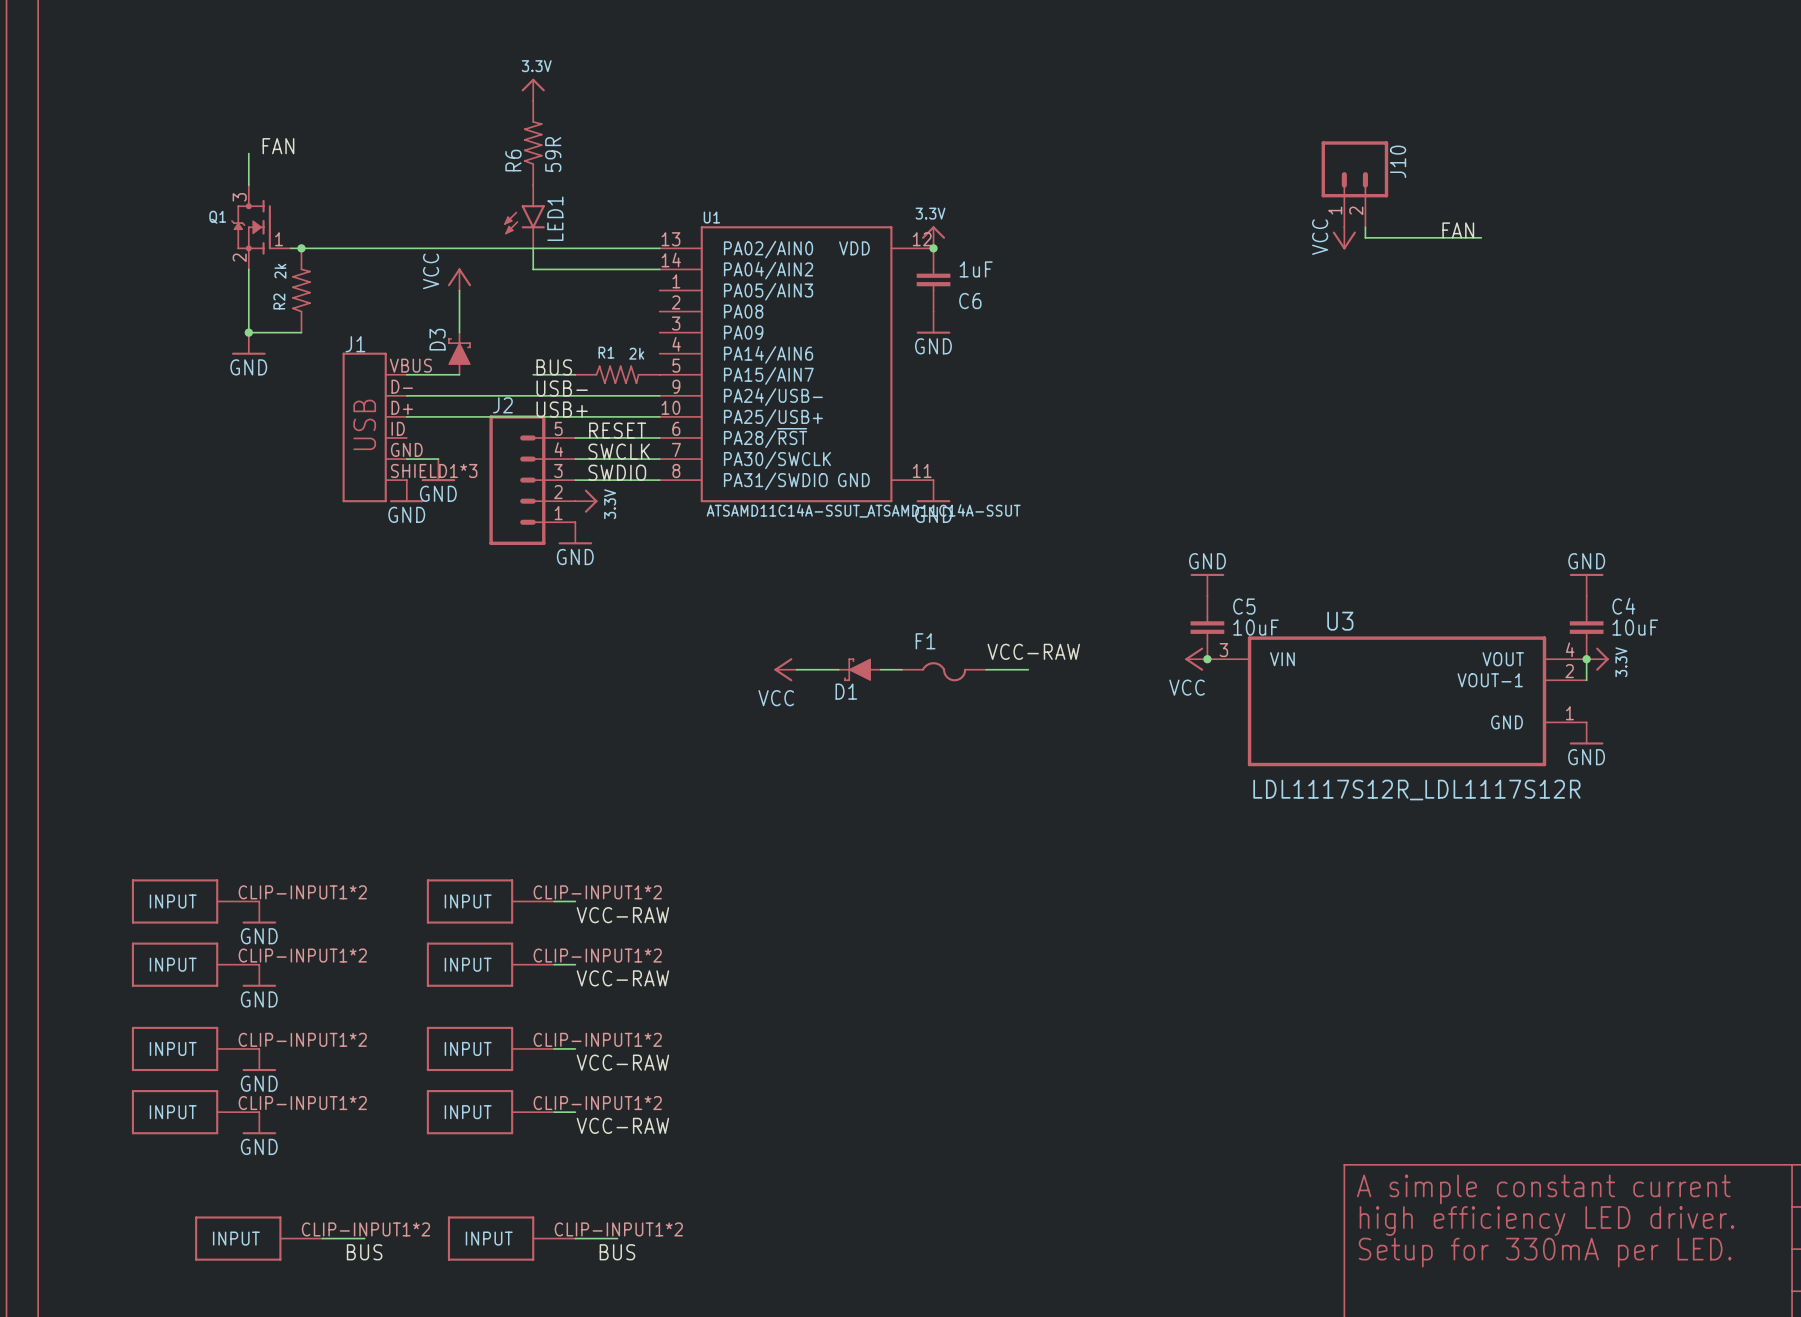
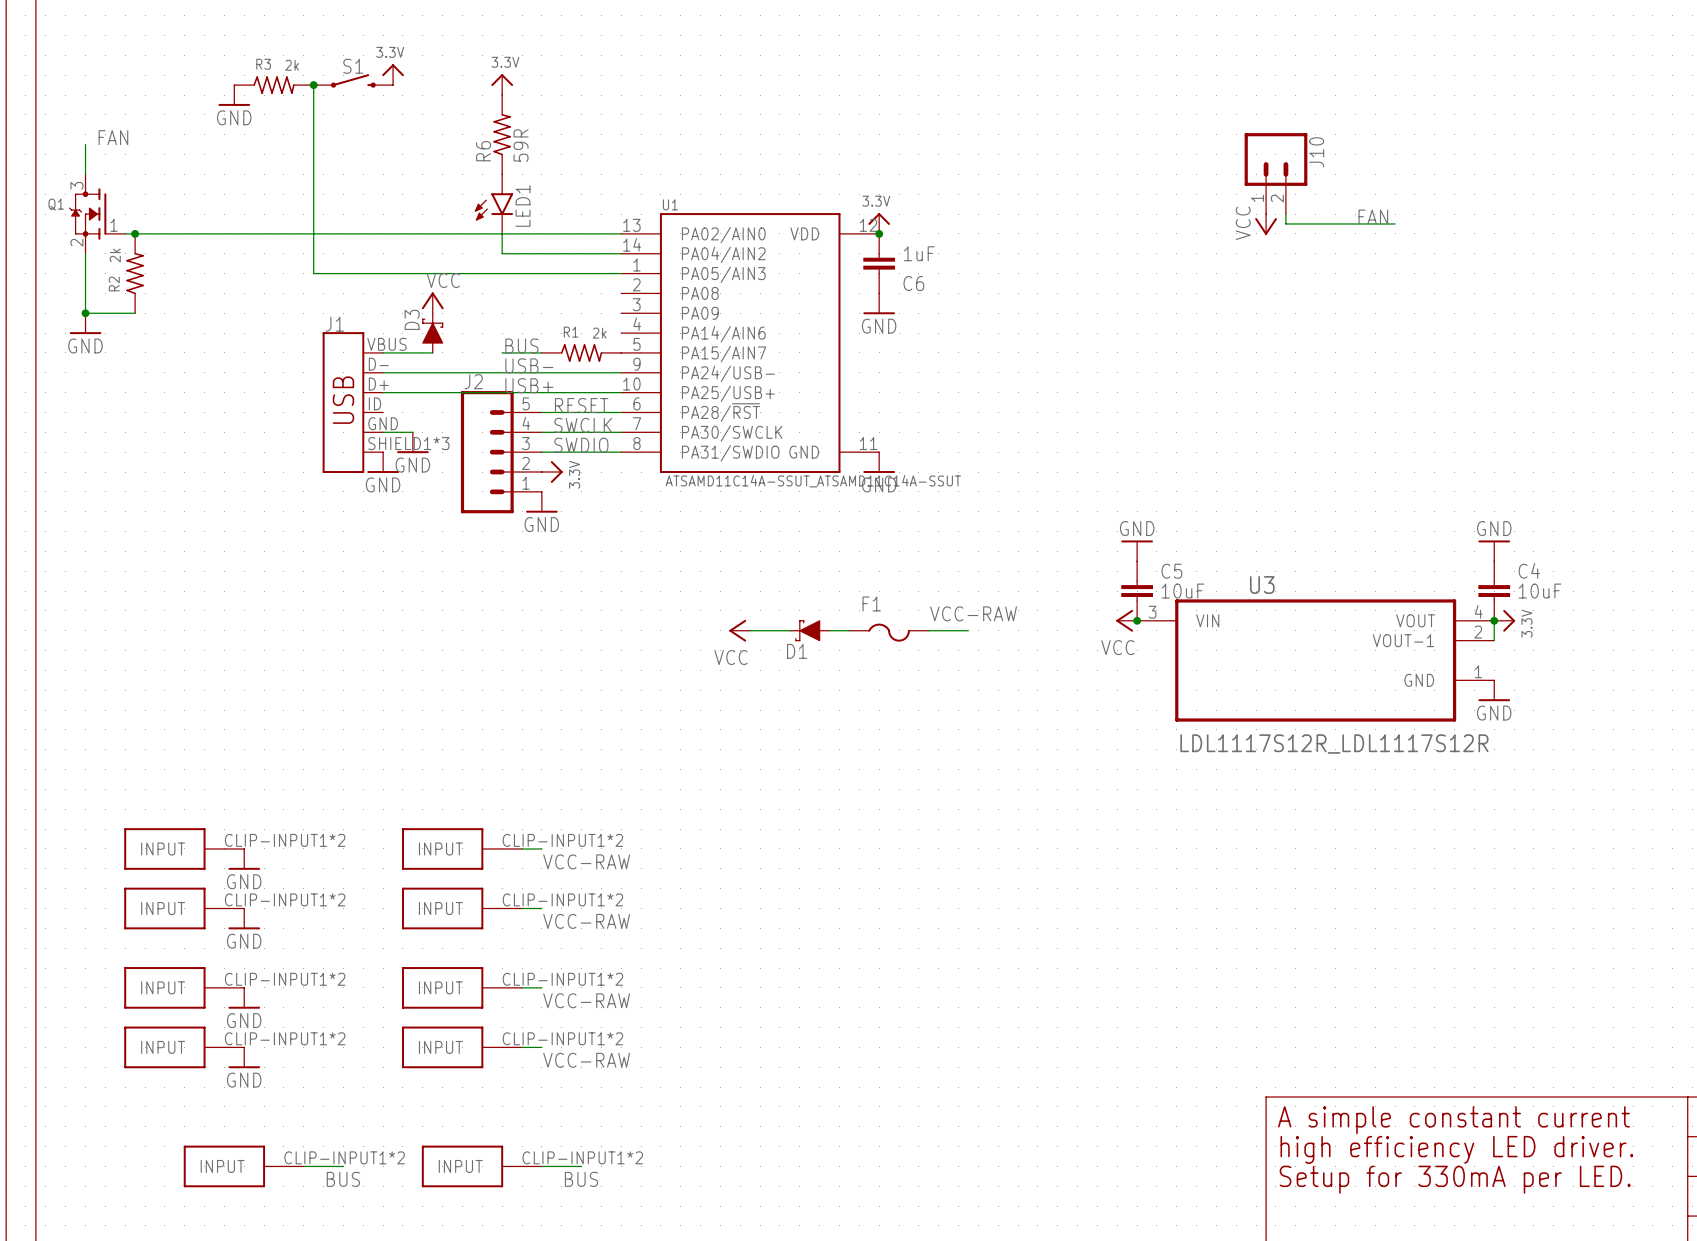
power symbol: none -> 3.3V (393, 74)
S1: none -> (353, 80)
R3: none -> 2k (274, 85)
wire: none -> (313, 85) (313, 273) (621, 273)
junction: none -> (313, 85)
power symbol: none -> GND (234, 95)
label position: FAN (278, 146) -> FAN (113, 137)
wire: (248, 153) (248, 185) -> (85, 144) (85, 174)
Q1 position: (261, 227) -> (97, 214)
wire: none -> (125, 233) (274, 233)
junction: none -> (135, 233)
junction: (301, 248) -> none
wire: (248, 269) (248, 332) (301, 332) -> (85, 253) (85, 313) (135, 313)
power symbol text rotation: 0° (431, 271) -> 90° clockwise (443, 280)
power symbol position: VCC (459, 279) -> VCC (432, 302)
R2 position: (301, 290) -> (135, 273)
junction: none -> (85, 313)
junction: (248, 332) -> none
power symbol: none -> GND (85, 323)
power symbol: GND (248, 343) -> none

